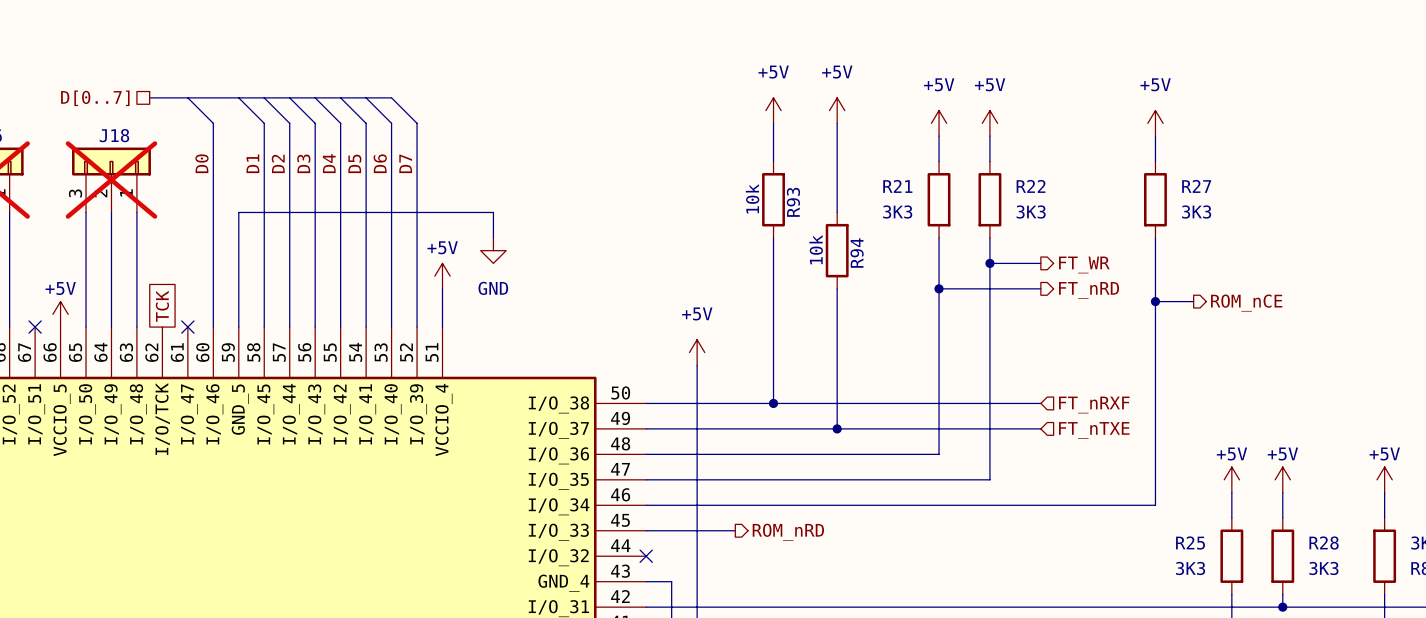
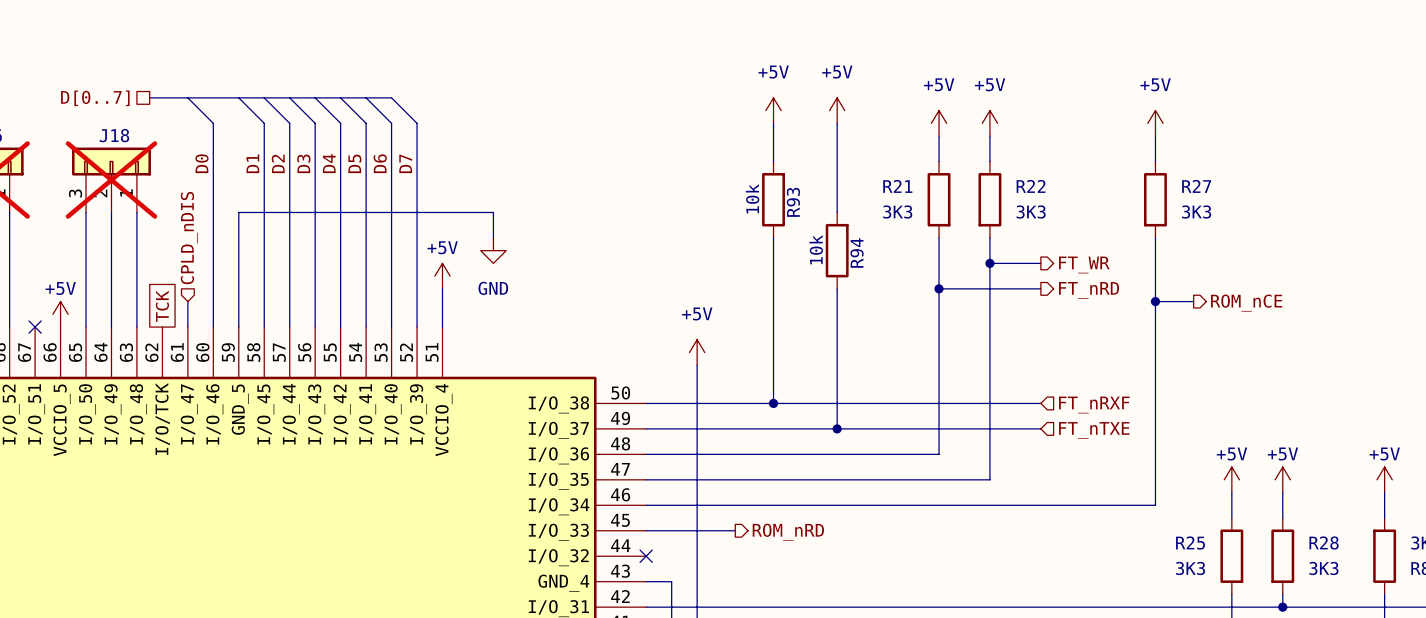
hierarchical label: none -> CPLD_nDIS (189, 238)
wire: none -> (187, 301) (187, 327)
no-connect mark: (187, 327) -> none

